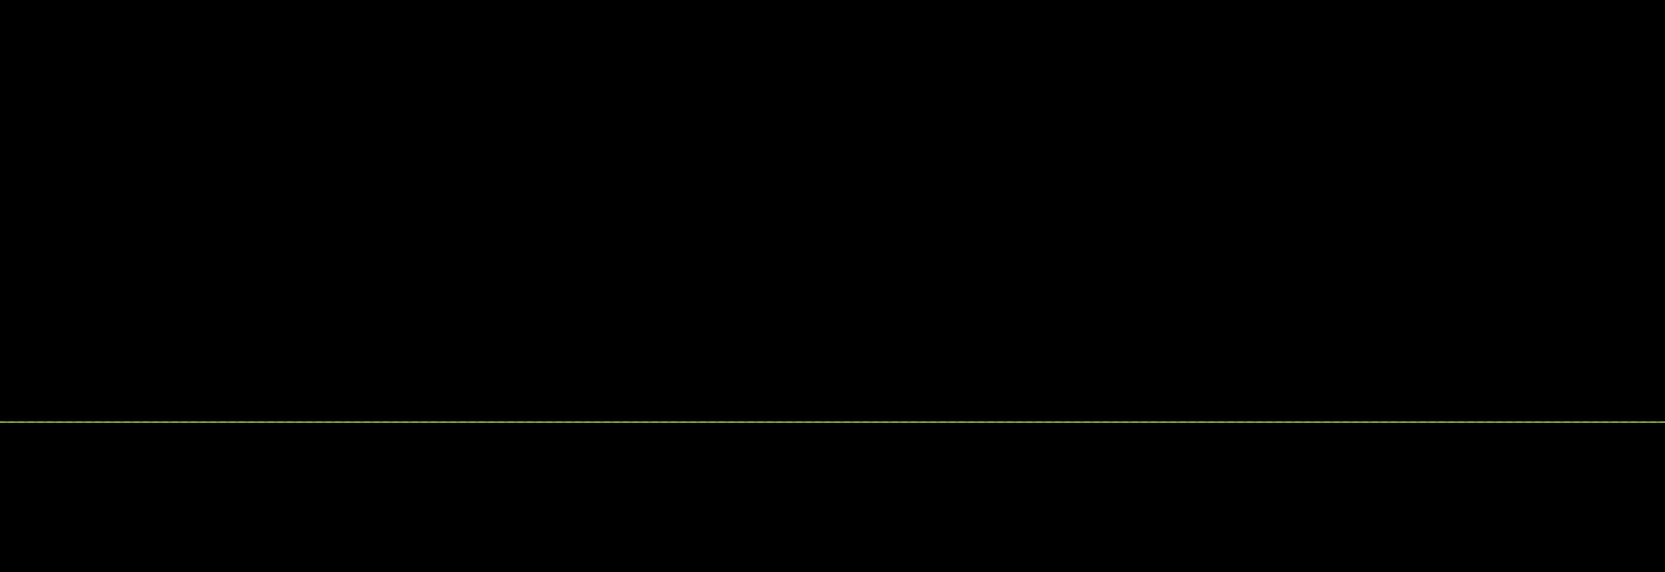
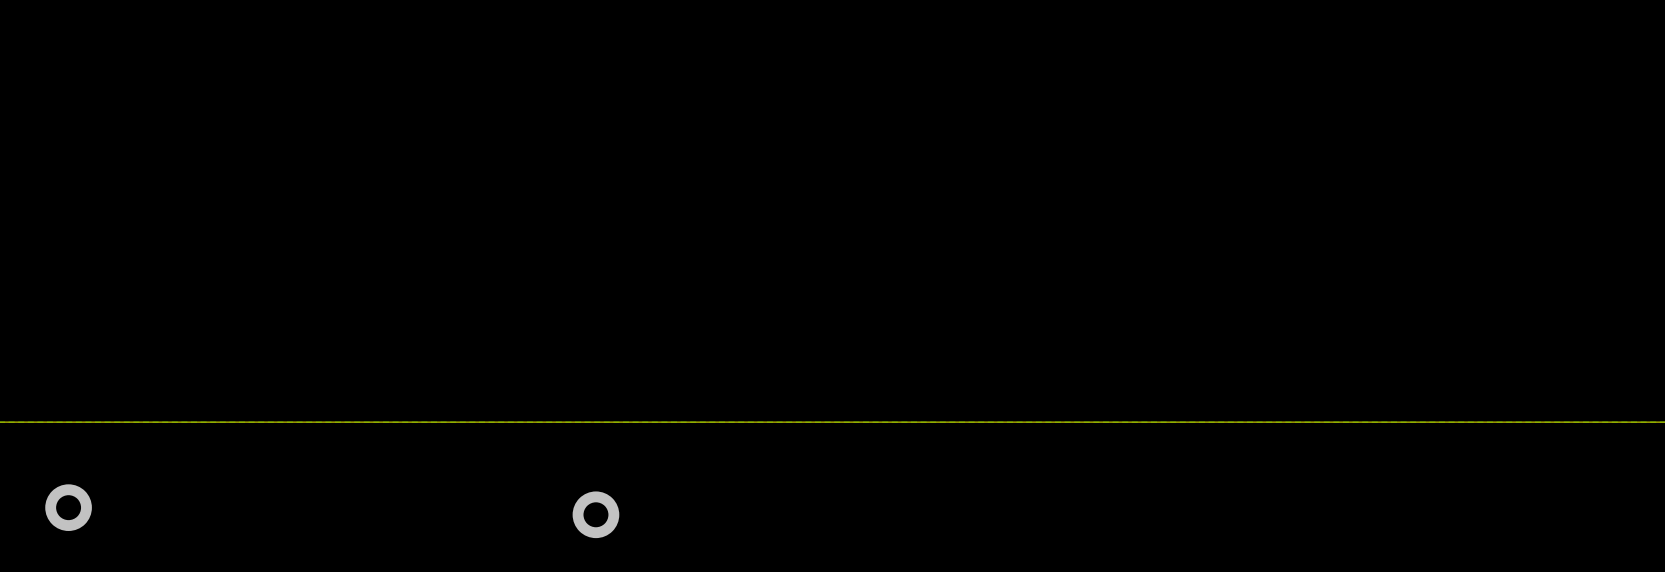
via: none -> (68, 507)
via: none -> (595, 514)

